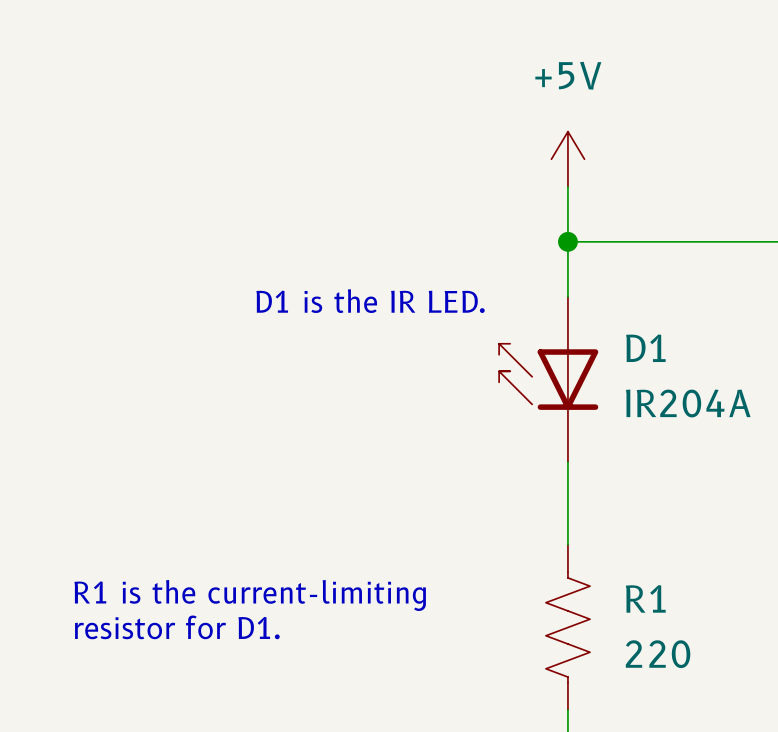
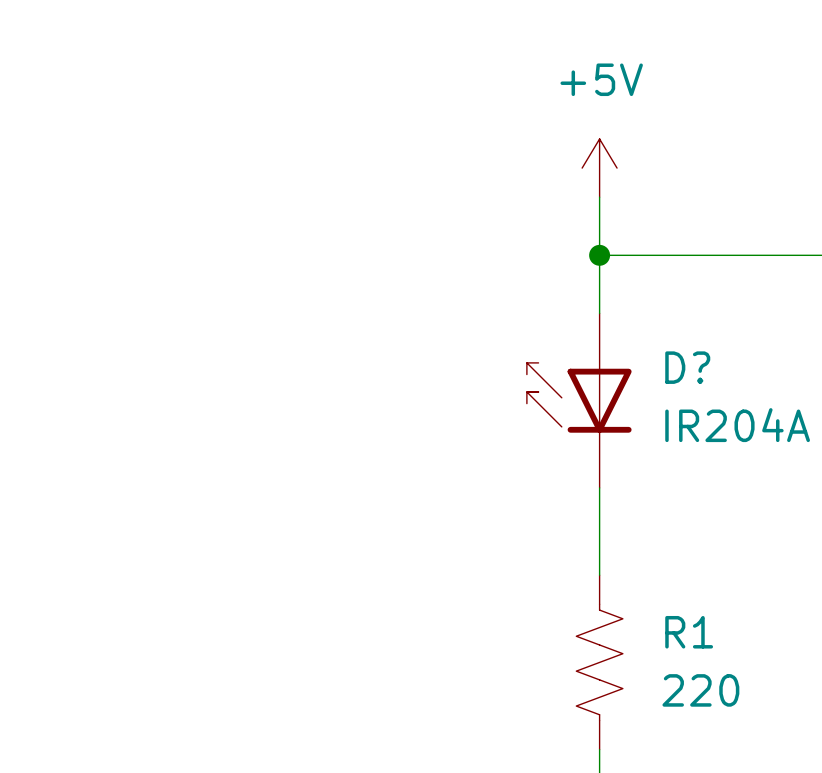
text: D1 is the IR LED. (370, 301) -> none
D1 name: D1 (645, 348) -> D? (687, 367)
text: R1 is the current-limiting (250, 595) -> none
text: resistor for D1. (177, 627) -> none

